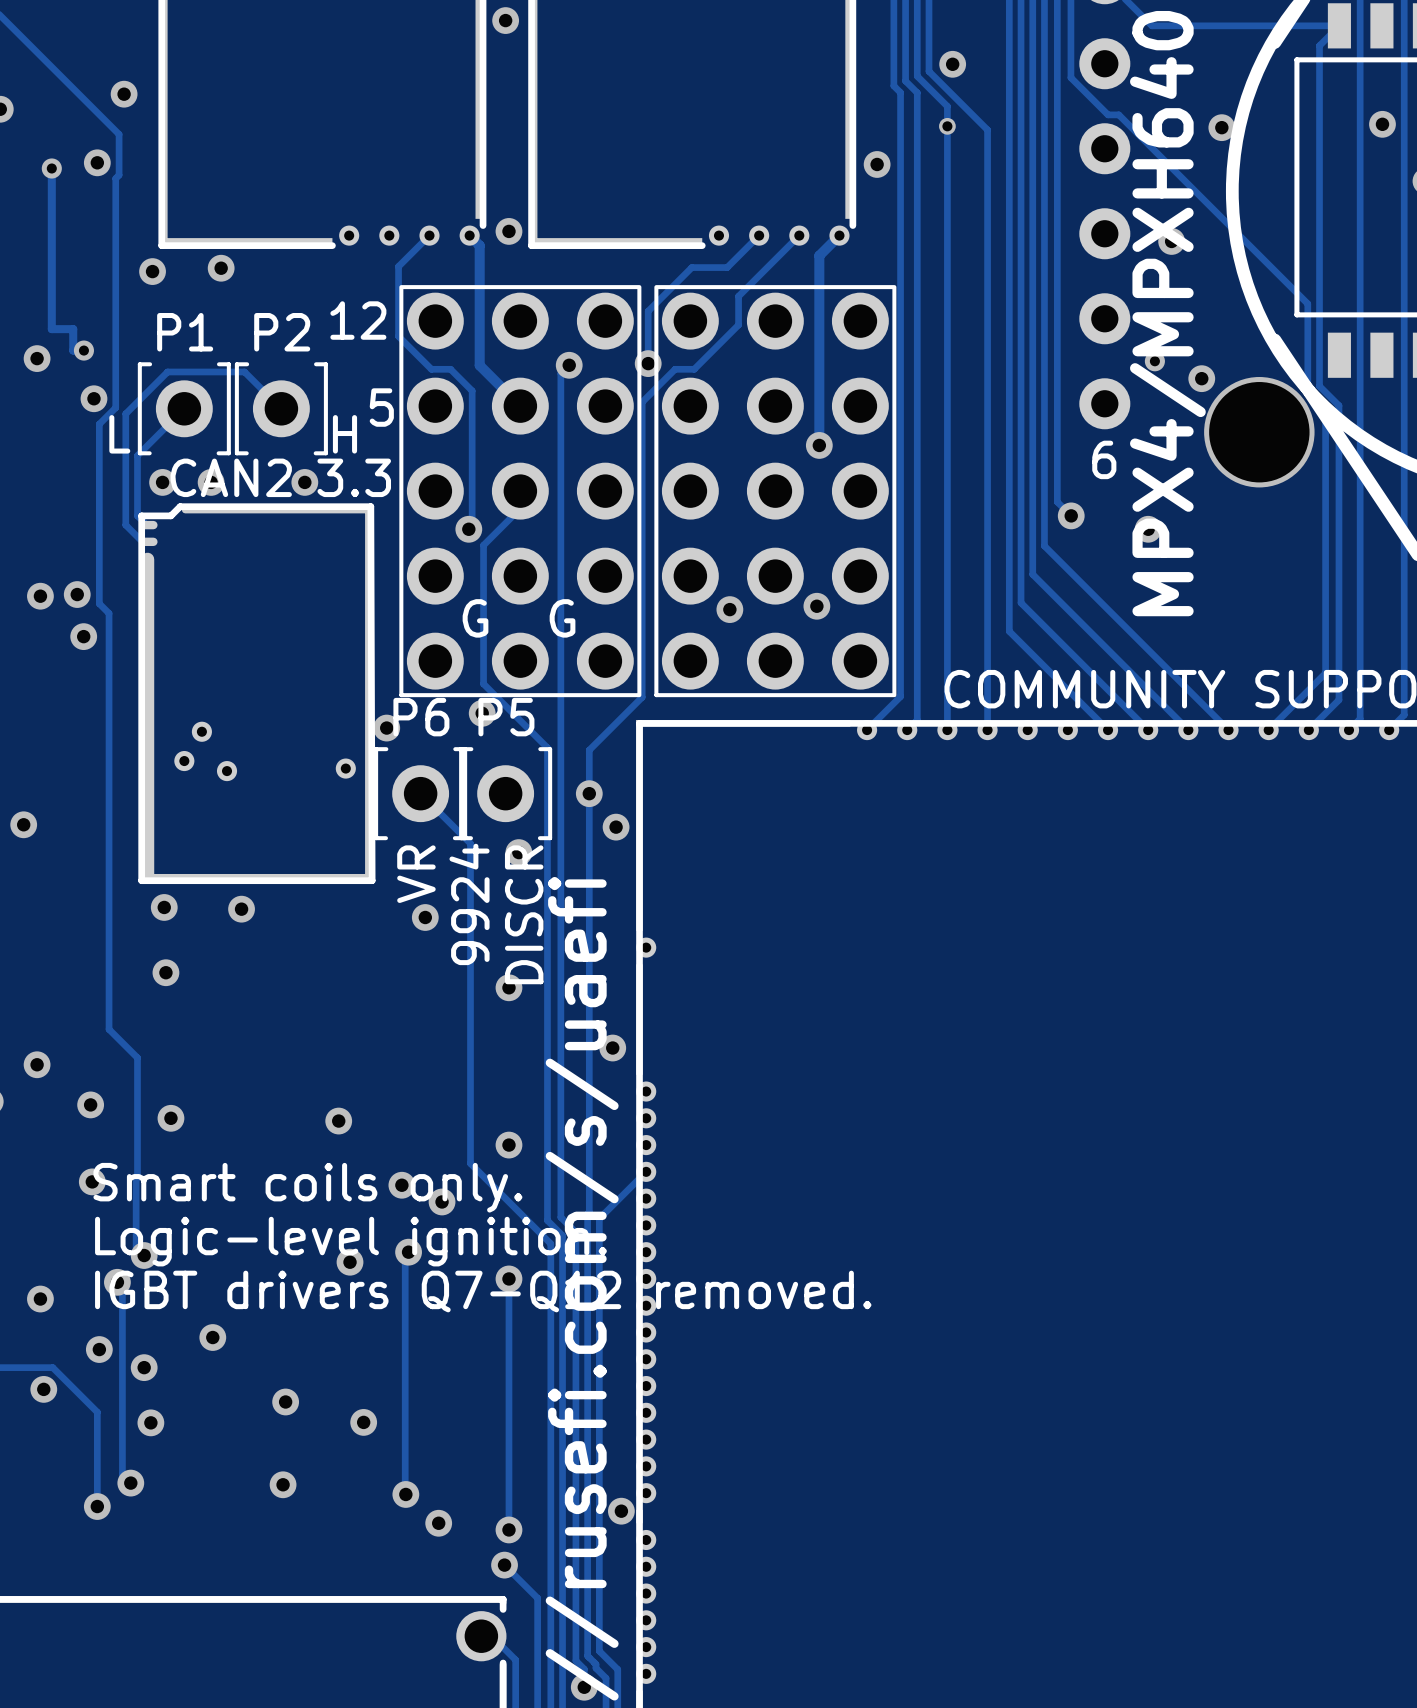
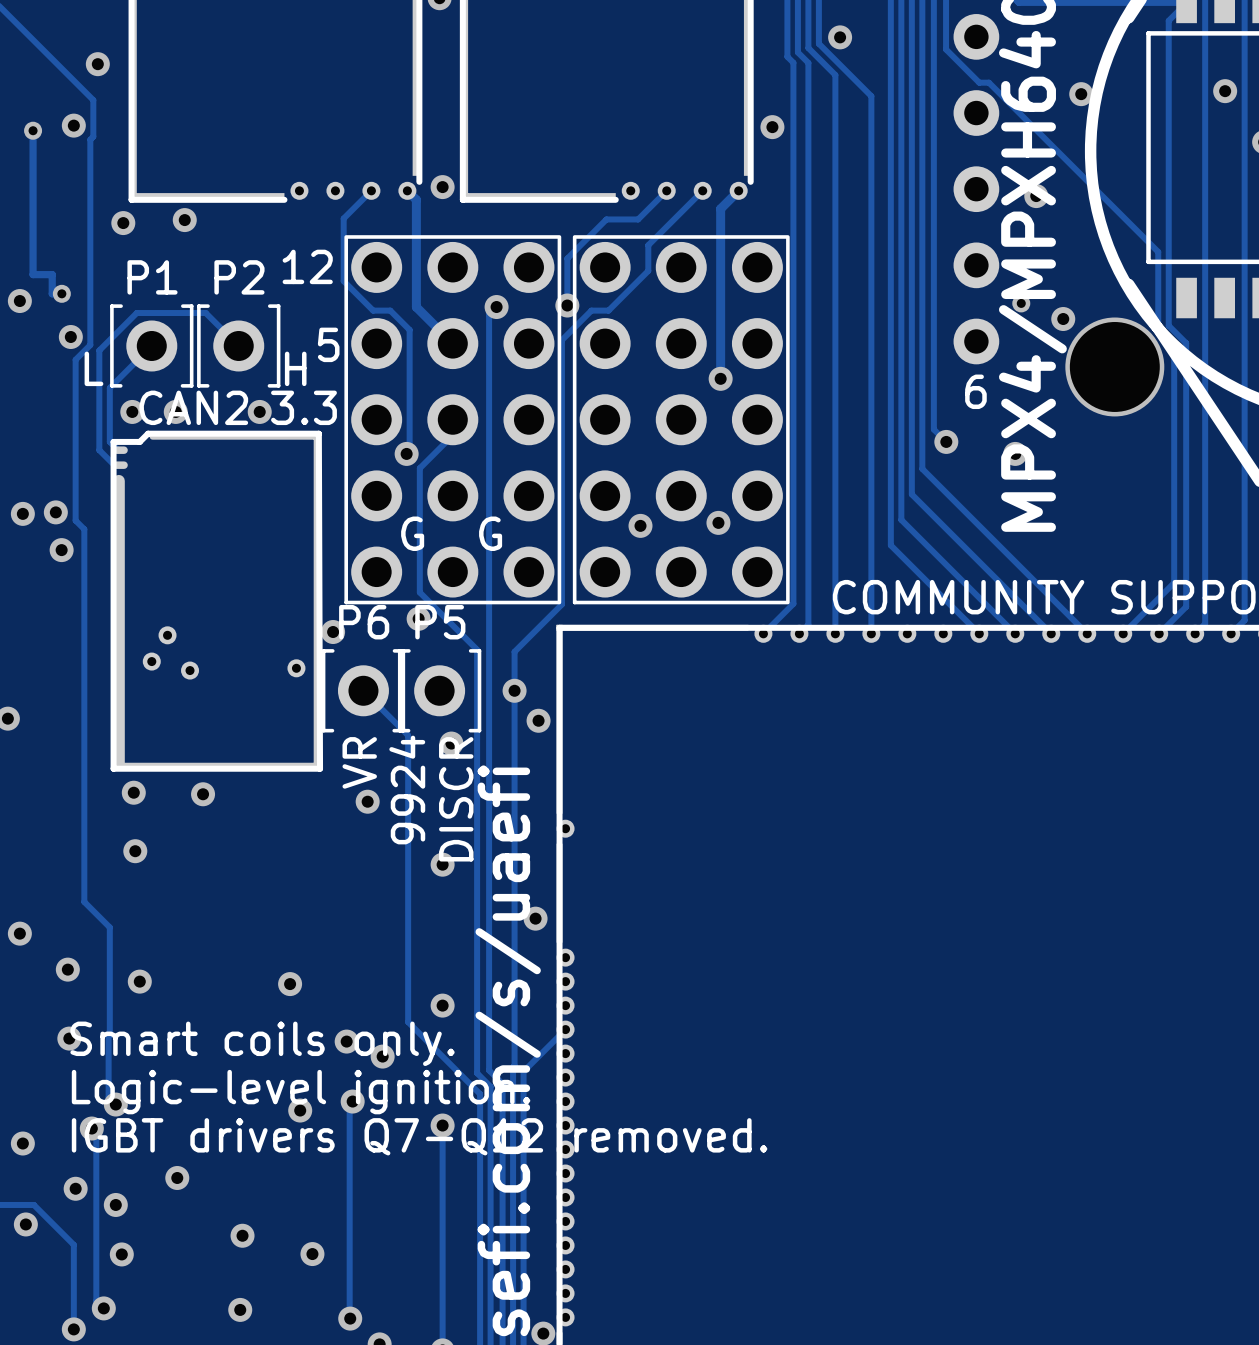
via: (947, 126) -> none

